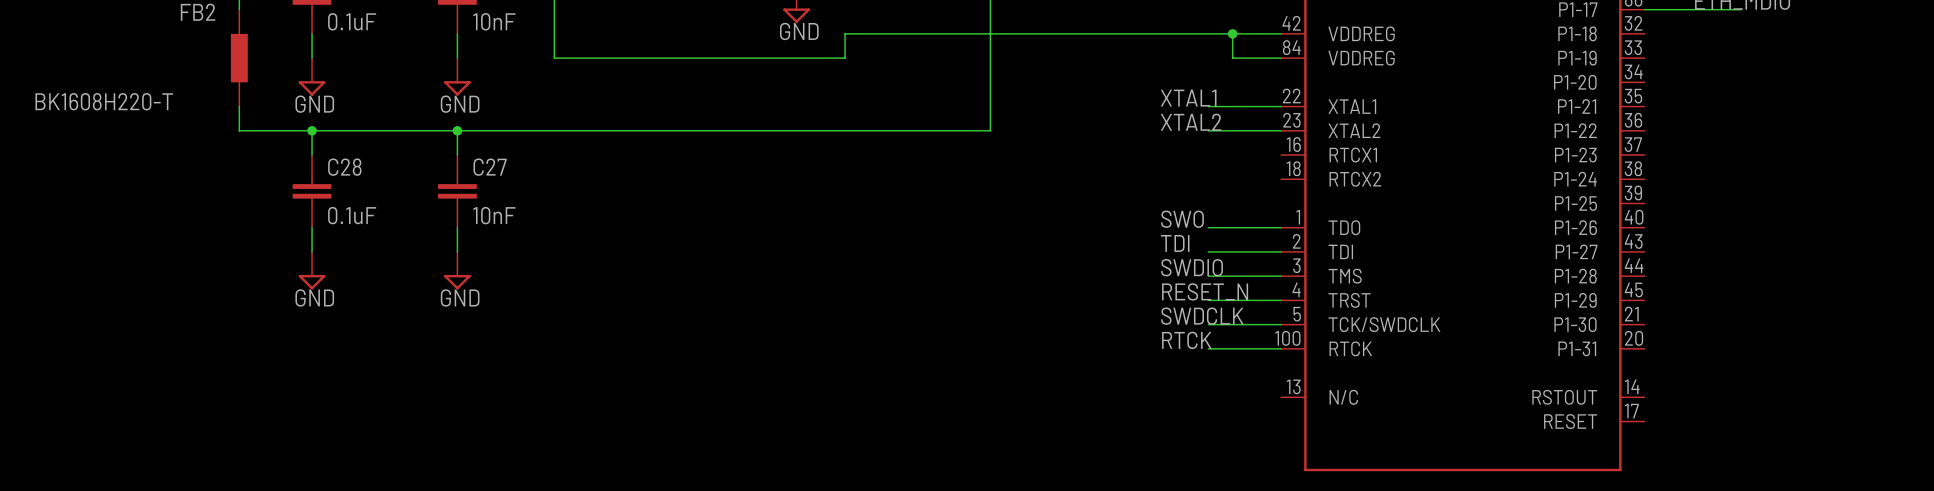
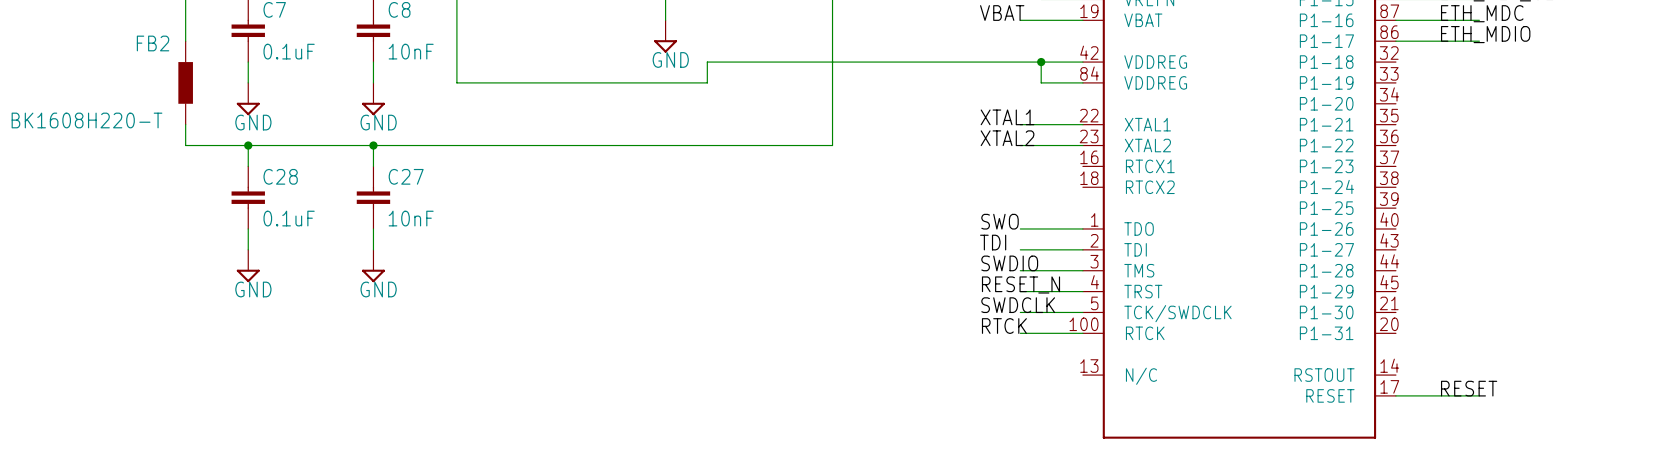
label: none -> RESET (1469, 388)
wire: none -> (1395, 395) (1479, 395)

